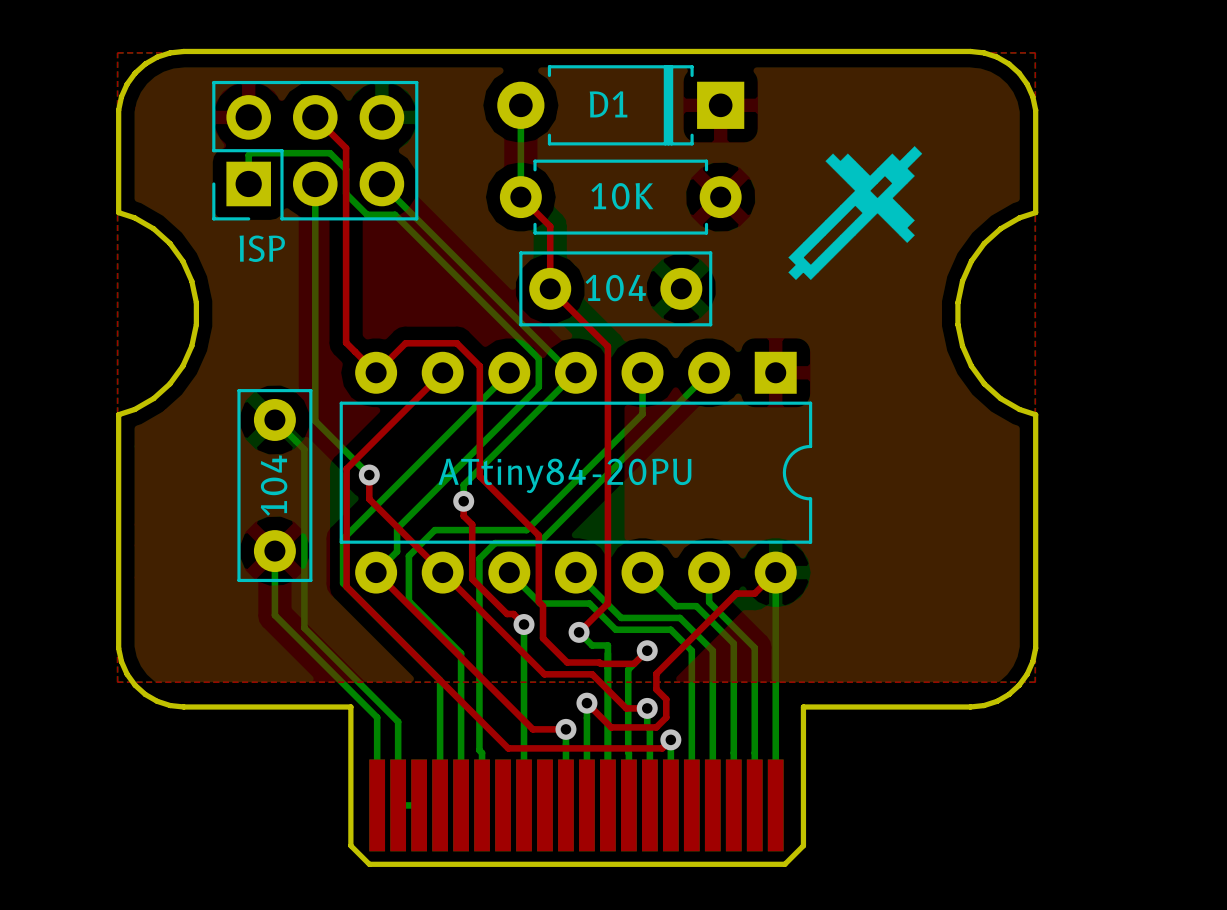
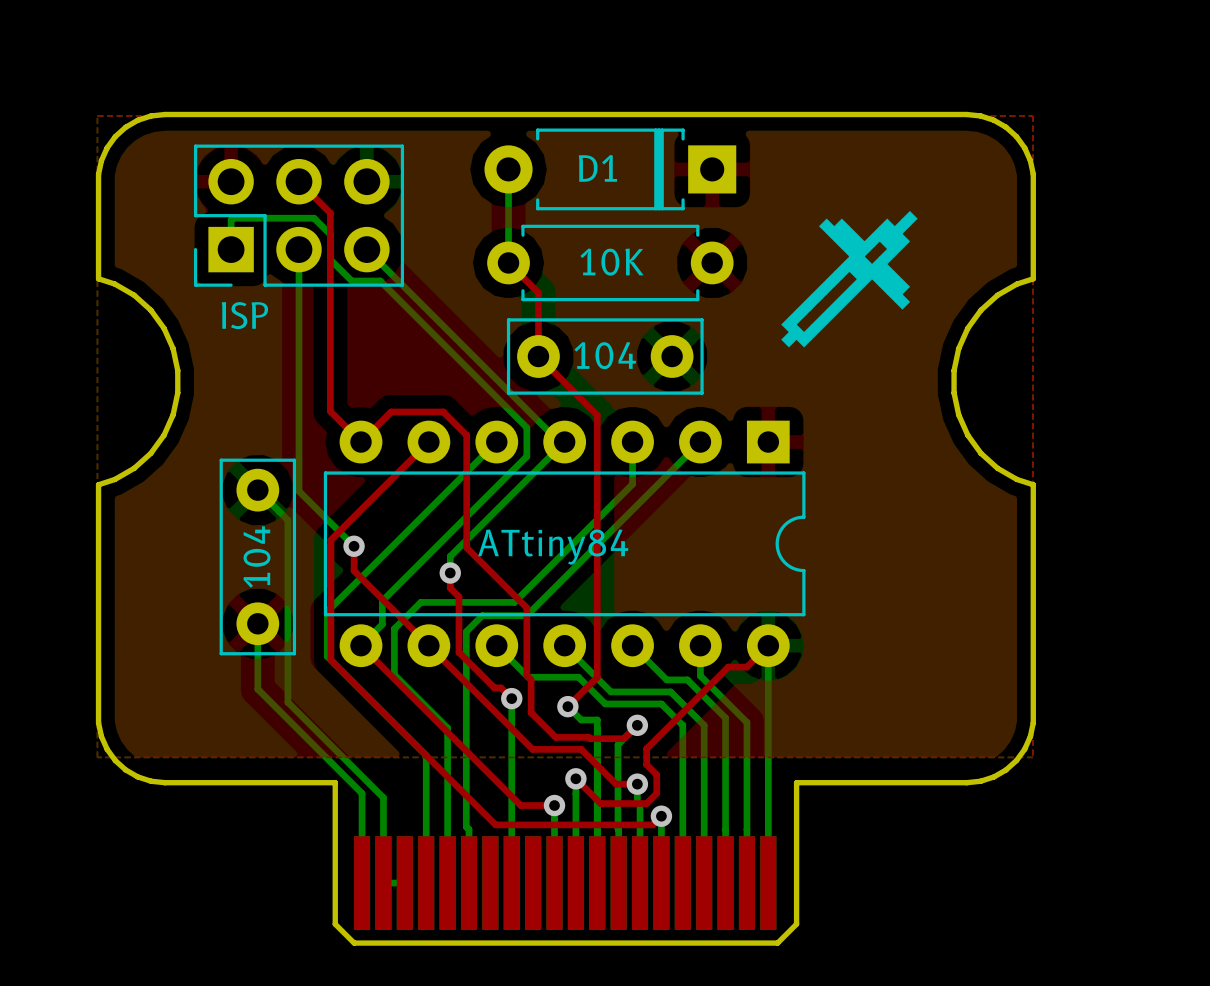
part value: ATtiny84-20PU (564, 475) -> ATtiny84 (553, 547)

